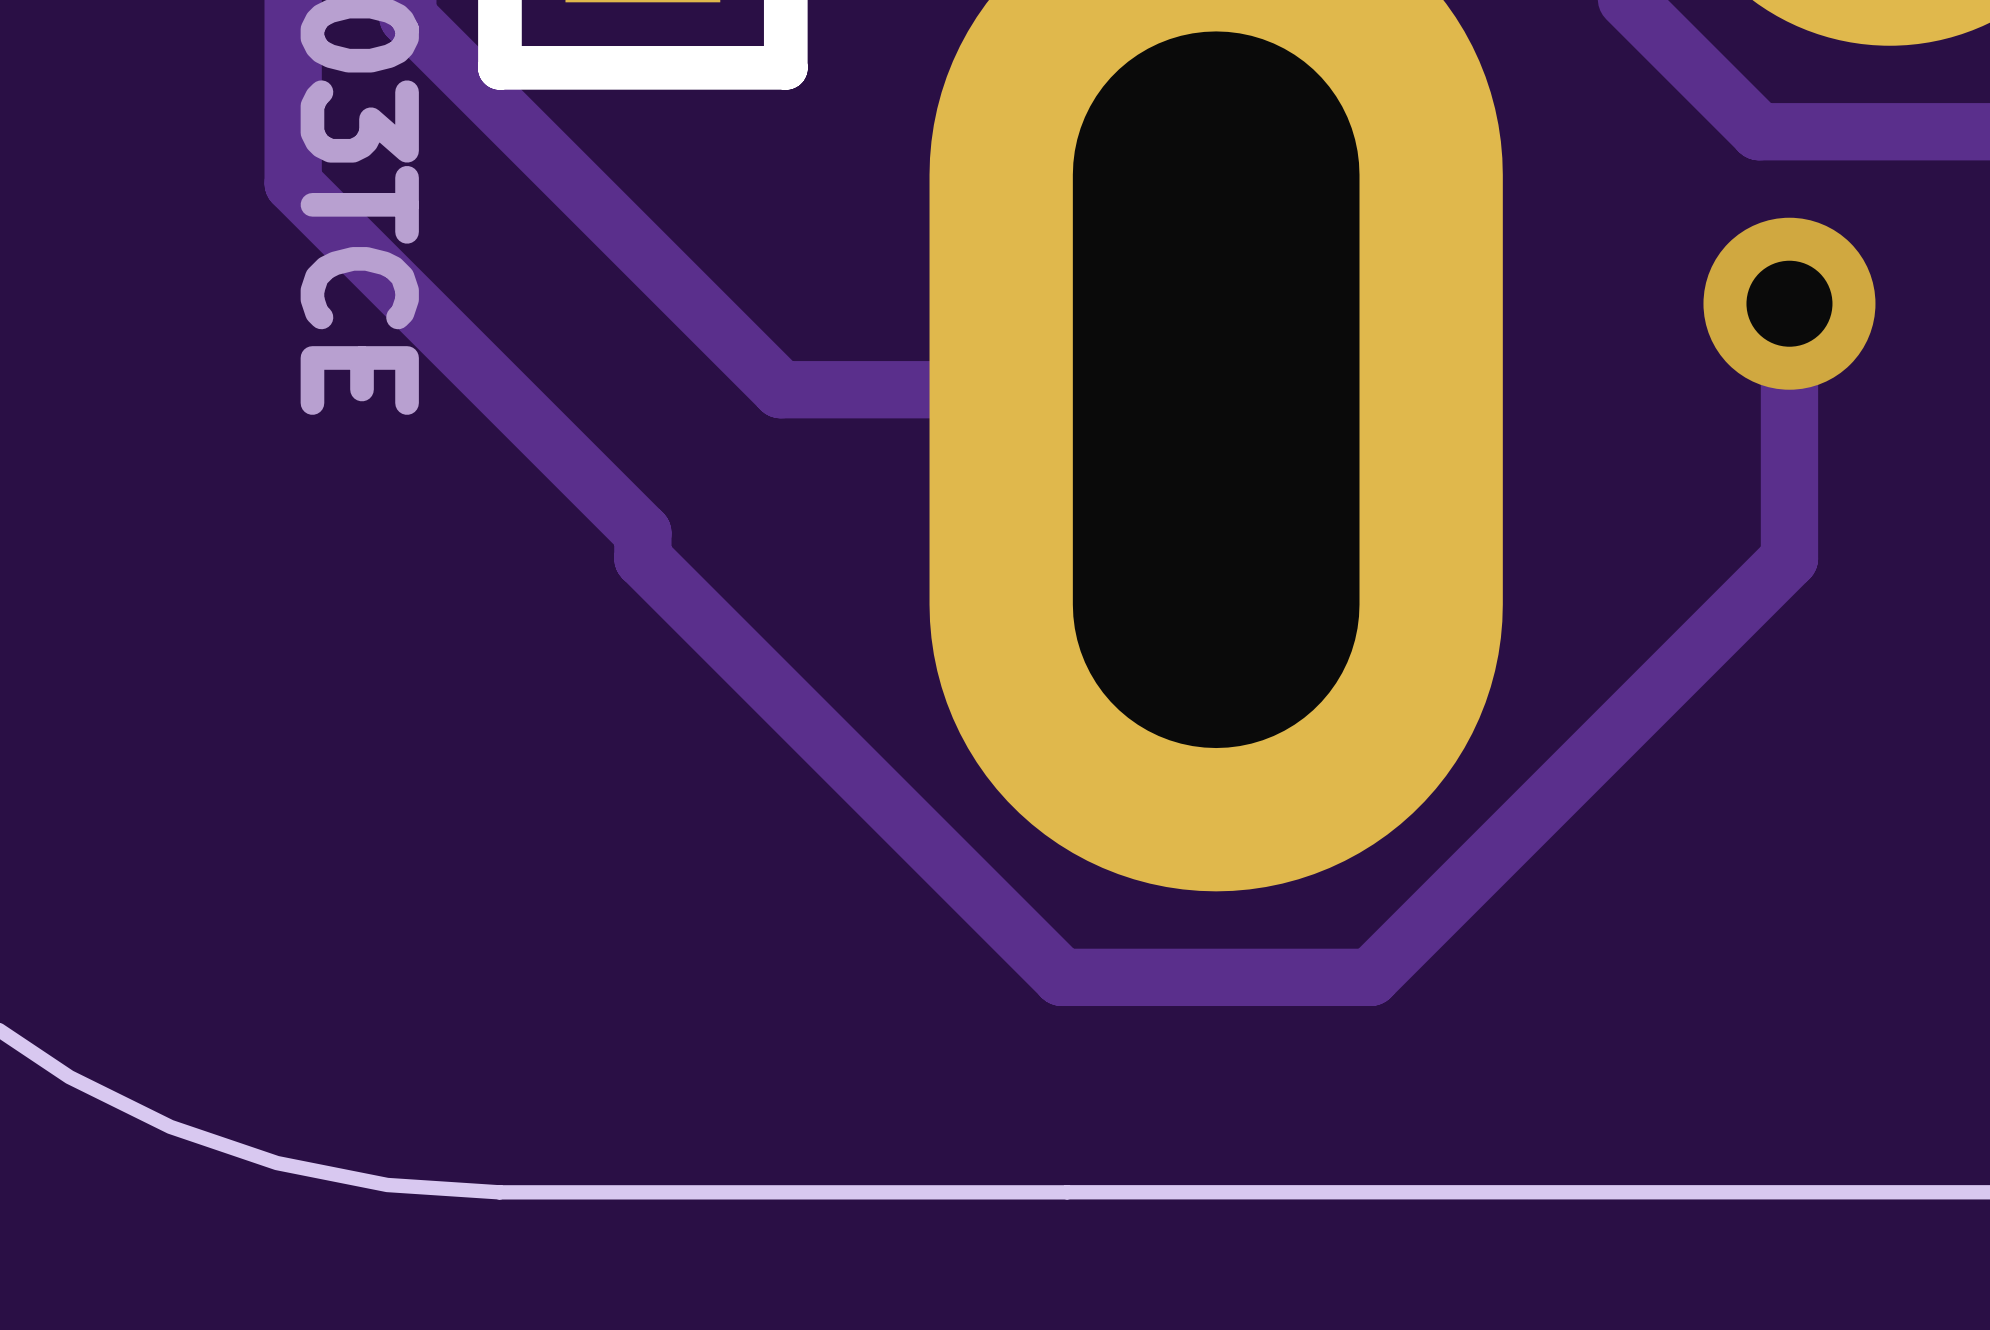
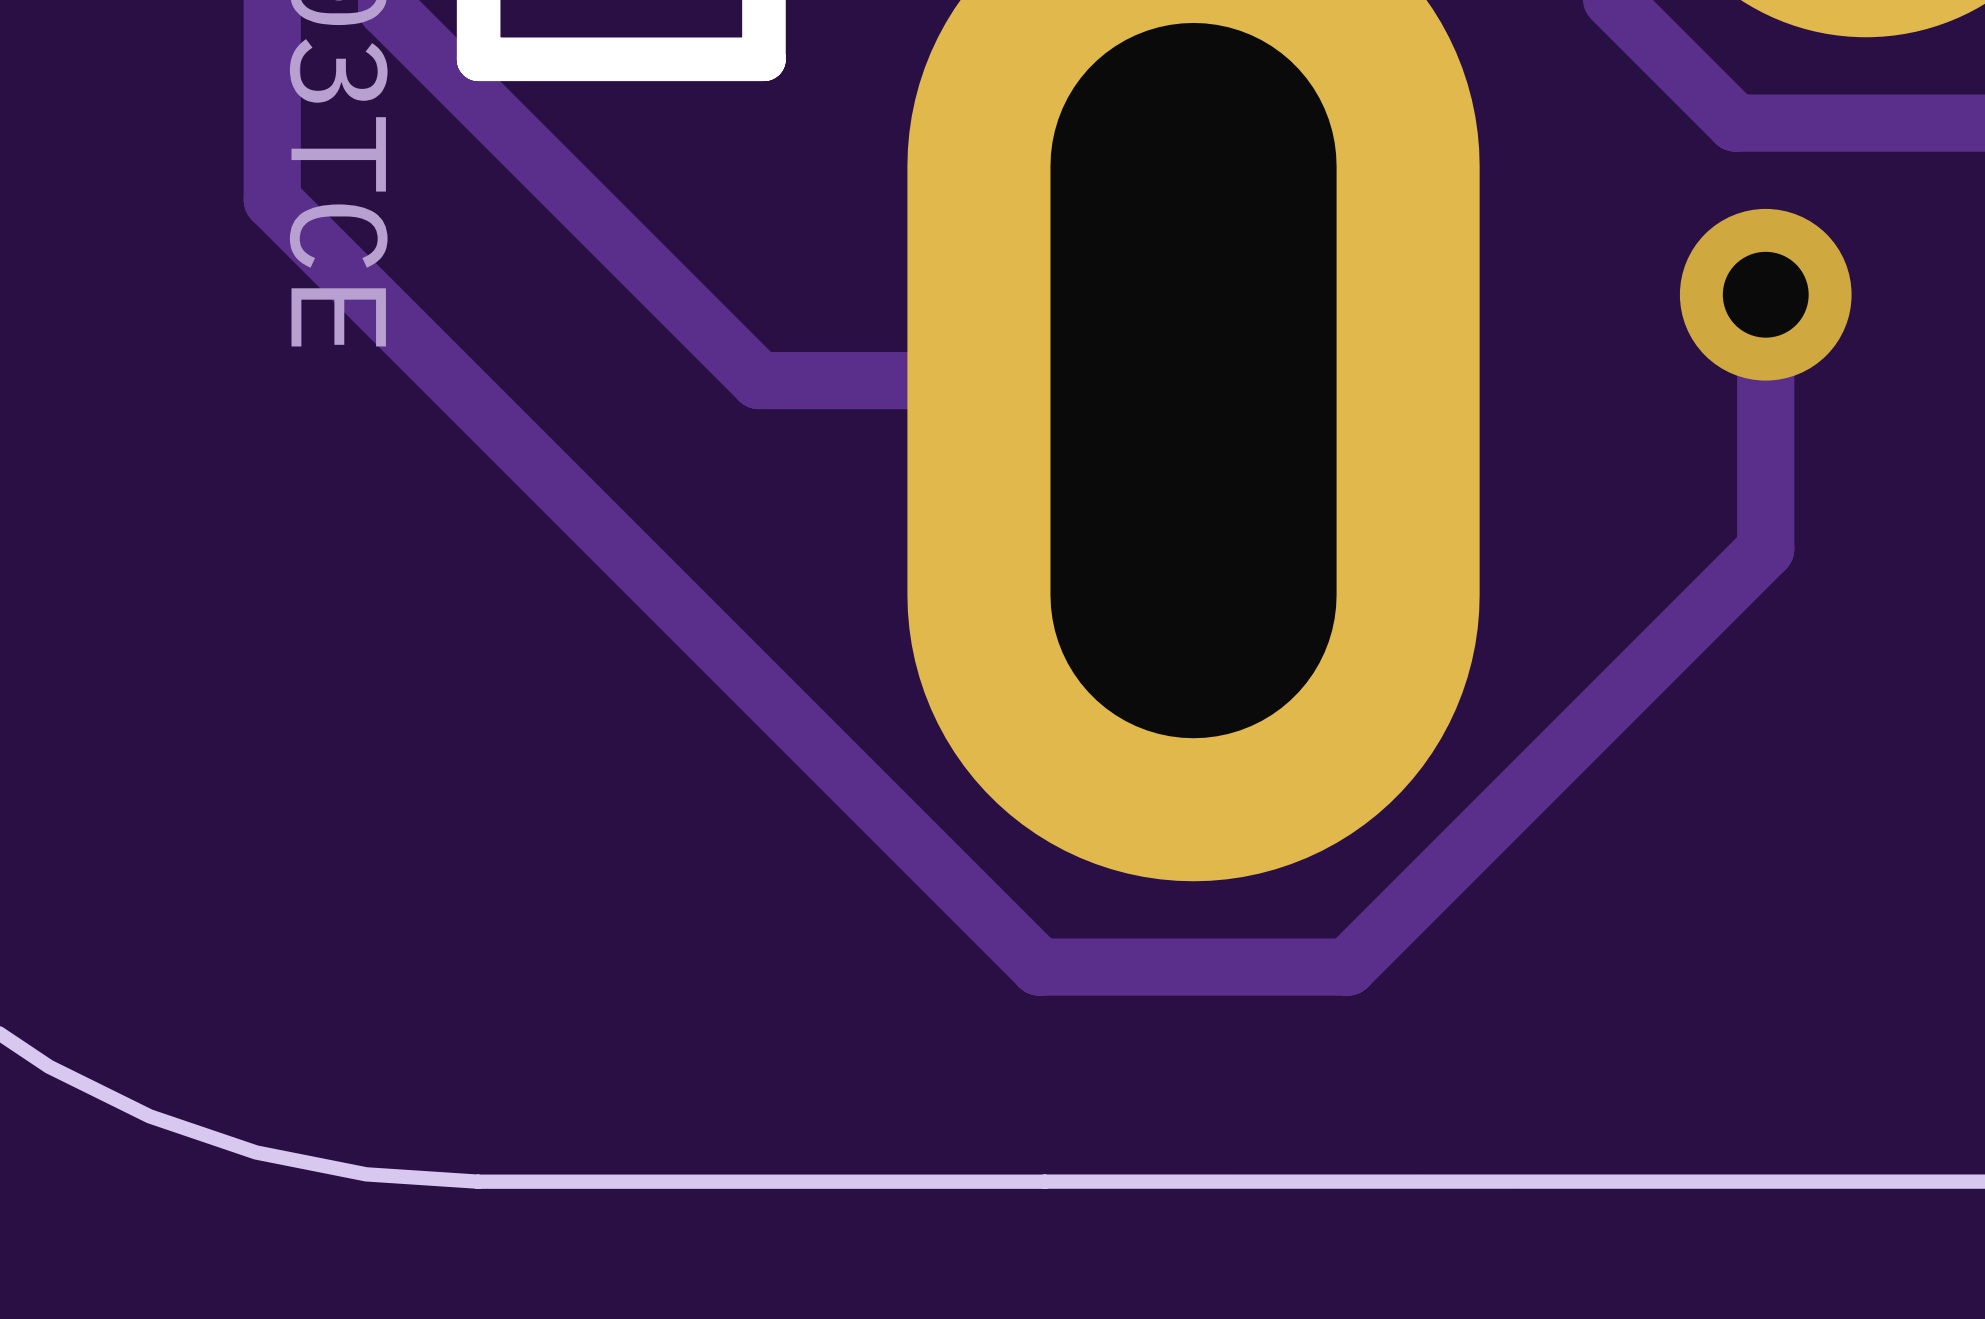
track: (293, 183) (642, 533) (642, 558) -> (272, 174) (272, 199) (621, 548)

